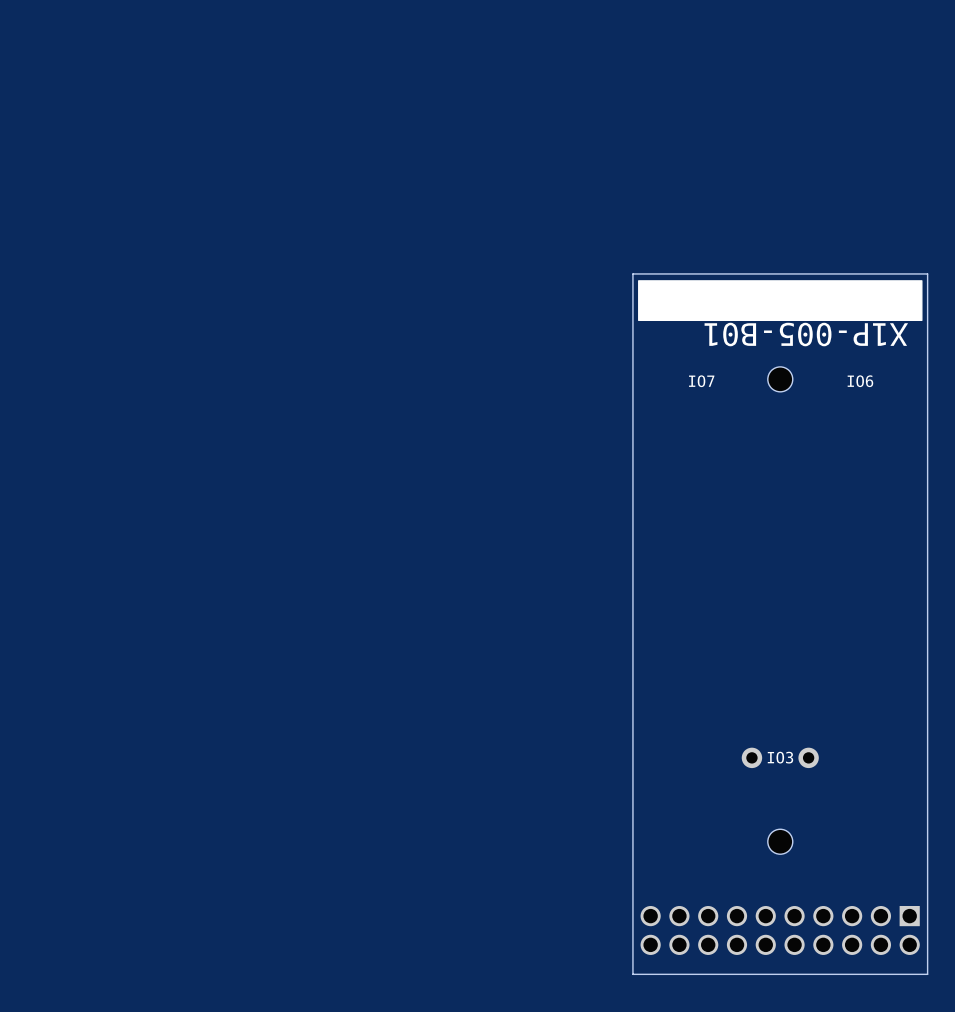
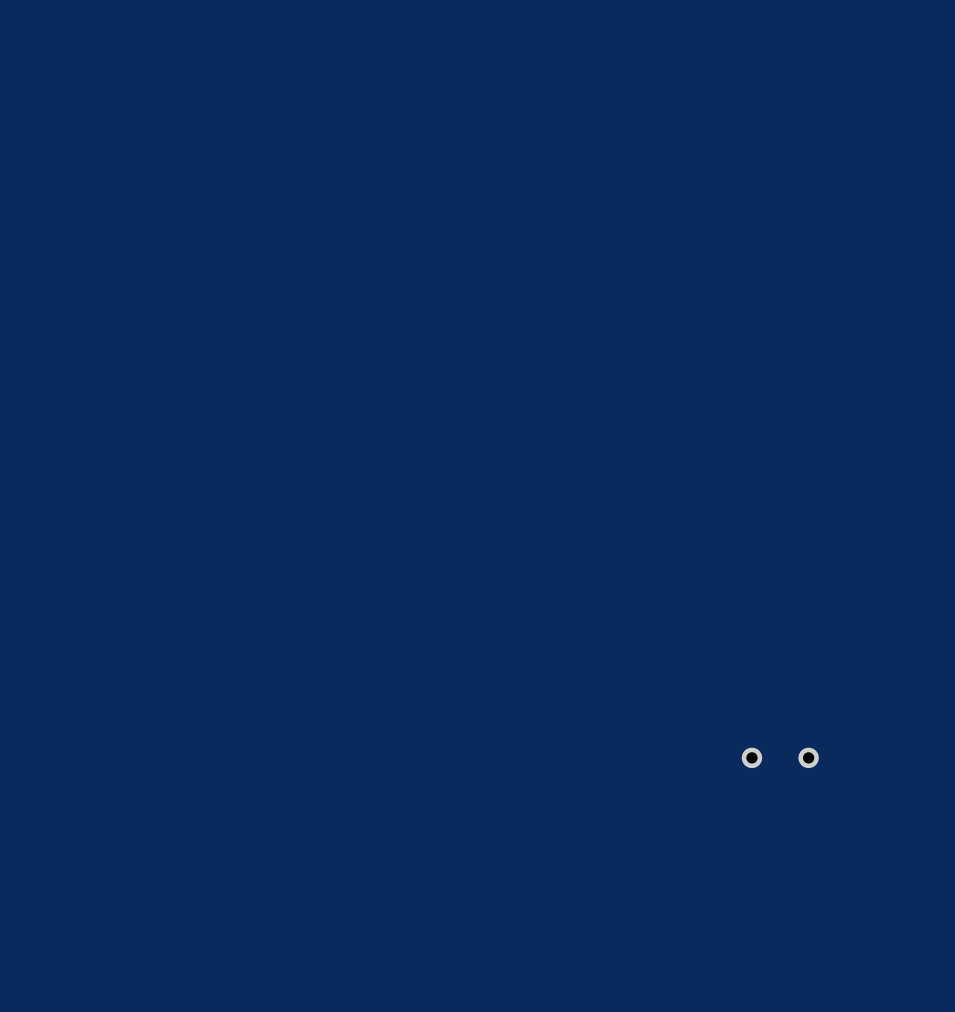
board edge: (927, 273) (632, 273) (632, 974) (927, 974) (927, 273) -> none
drawing: [638, 280, 923, 322] -> none
text: X1P-005-B01 (806, 334) -> none
part: (780, 379) -> none
part: (701, 381) -> none
part: (860, 381) -> none
text: IO3 (780, 757) -> none
part: (780, 841) -> none
part: (780, 930) -> none

